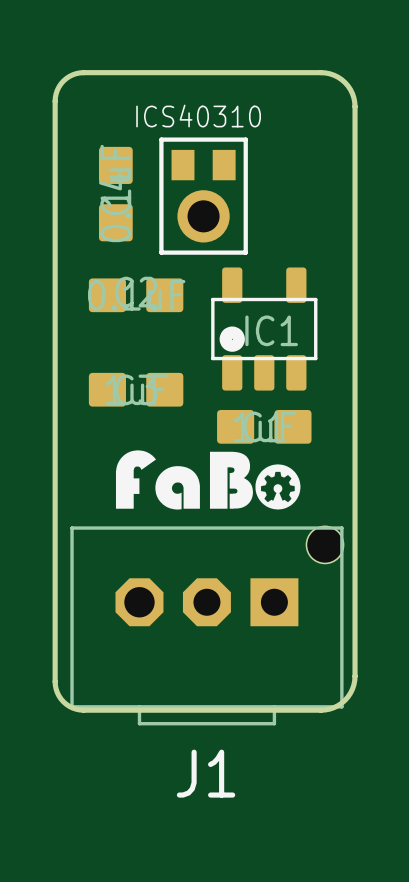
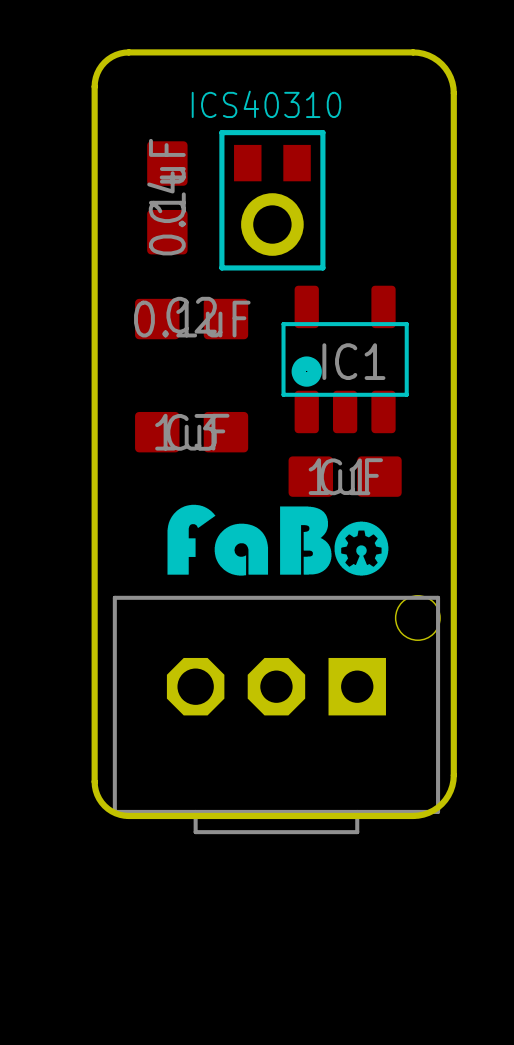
J1 name: J1 (206, 773) -> none

